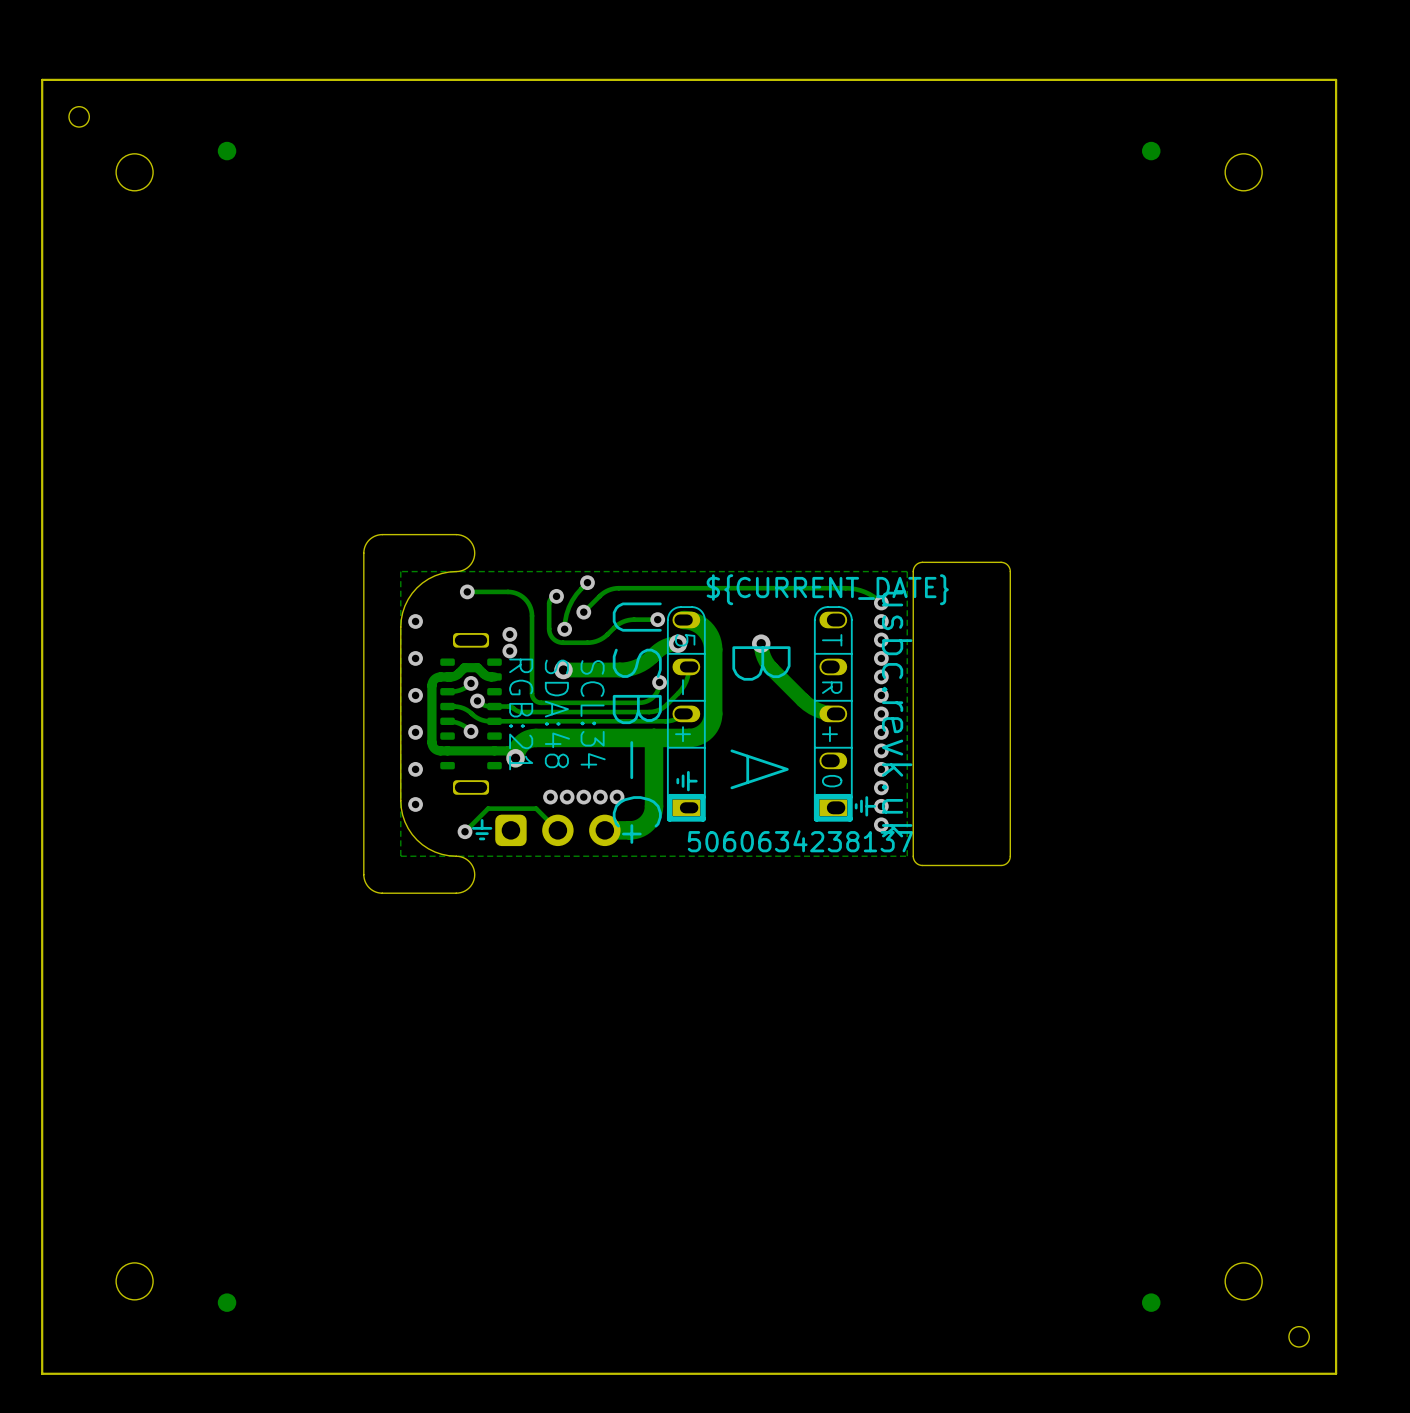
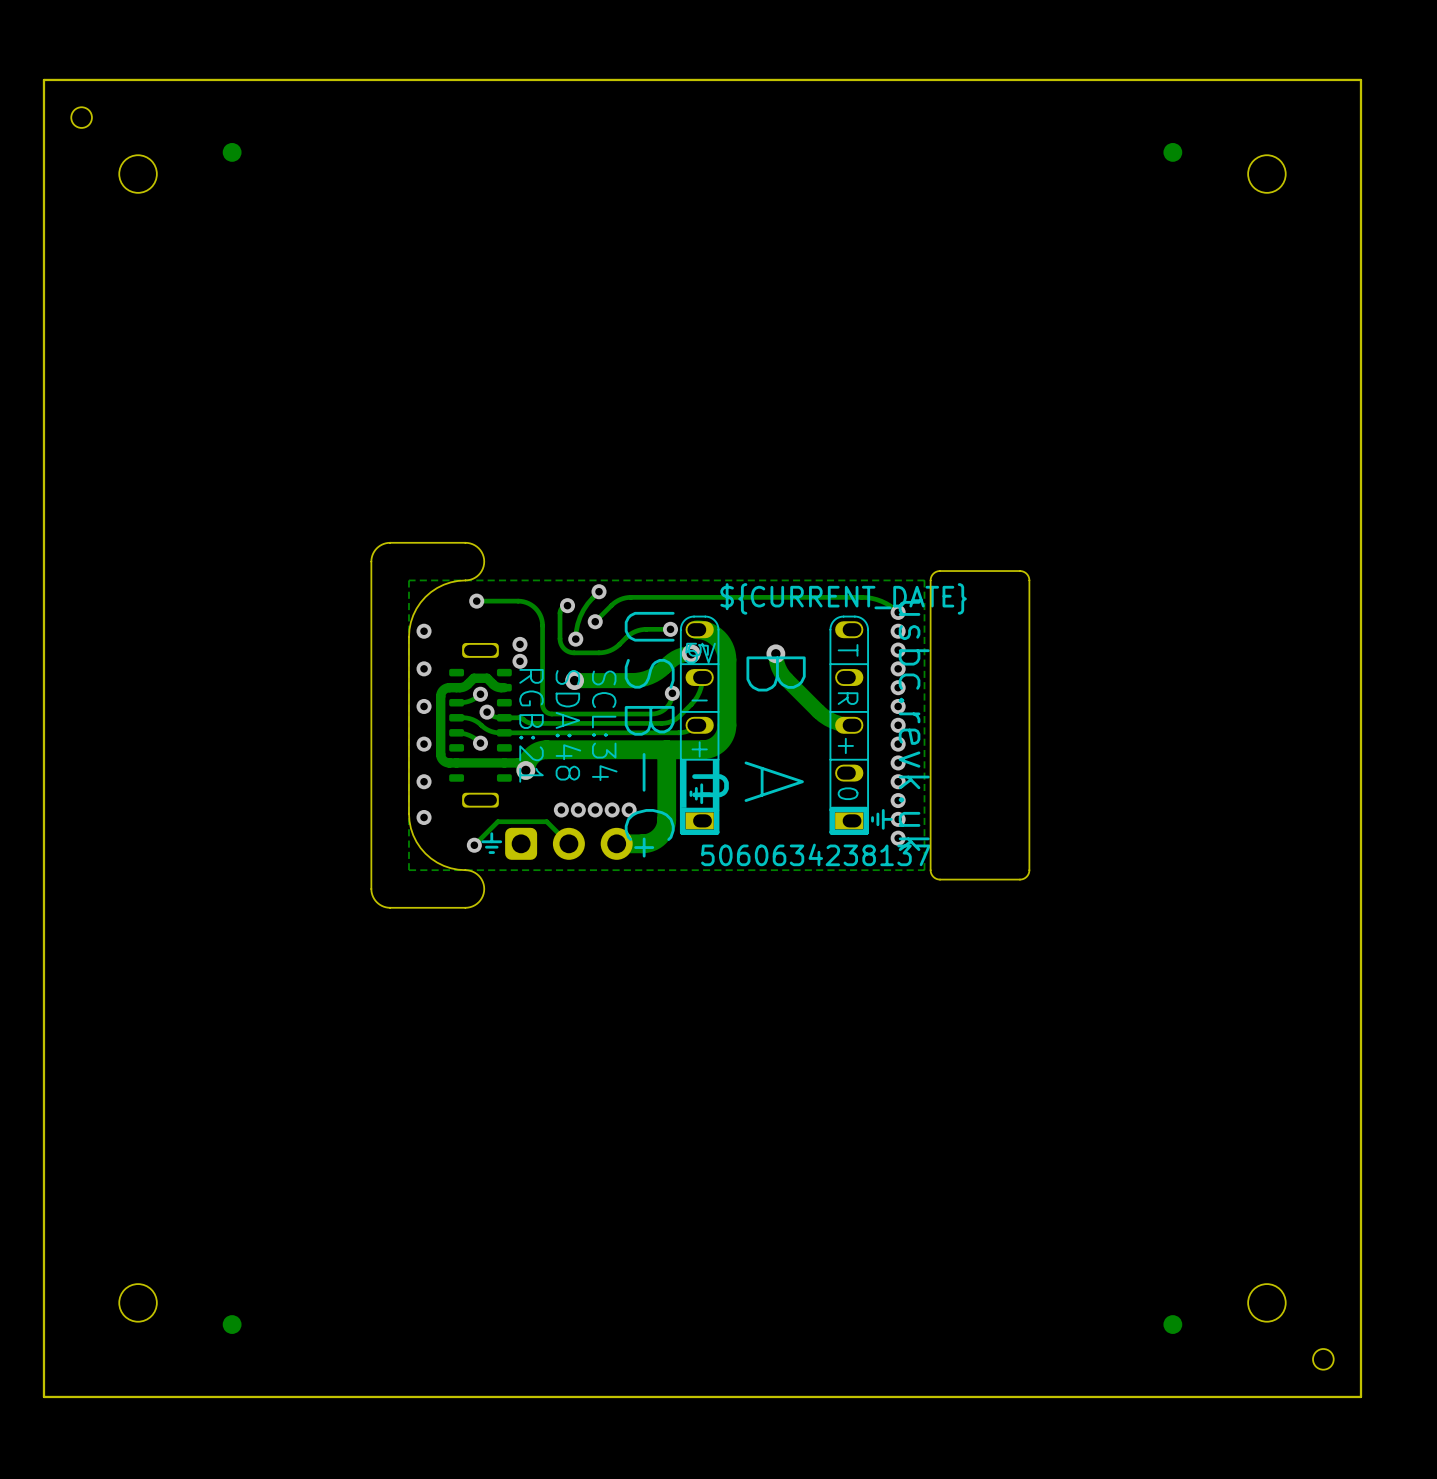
part footprint: [666, 606, 706, 822] -> [679, 615, 720, 835]

